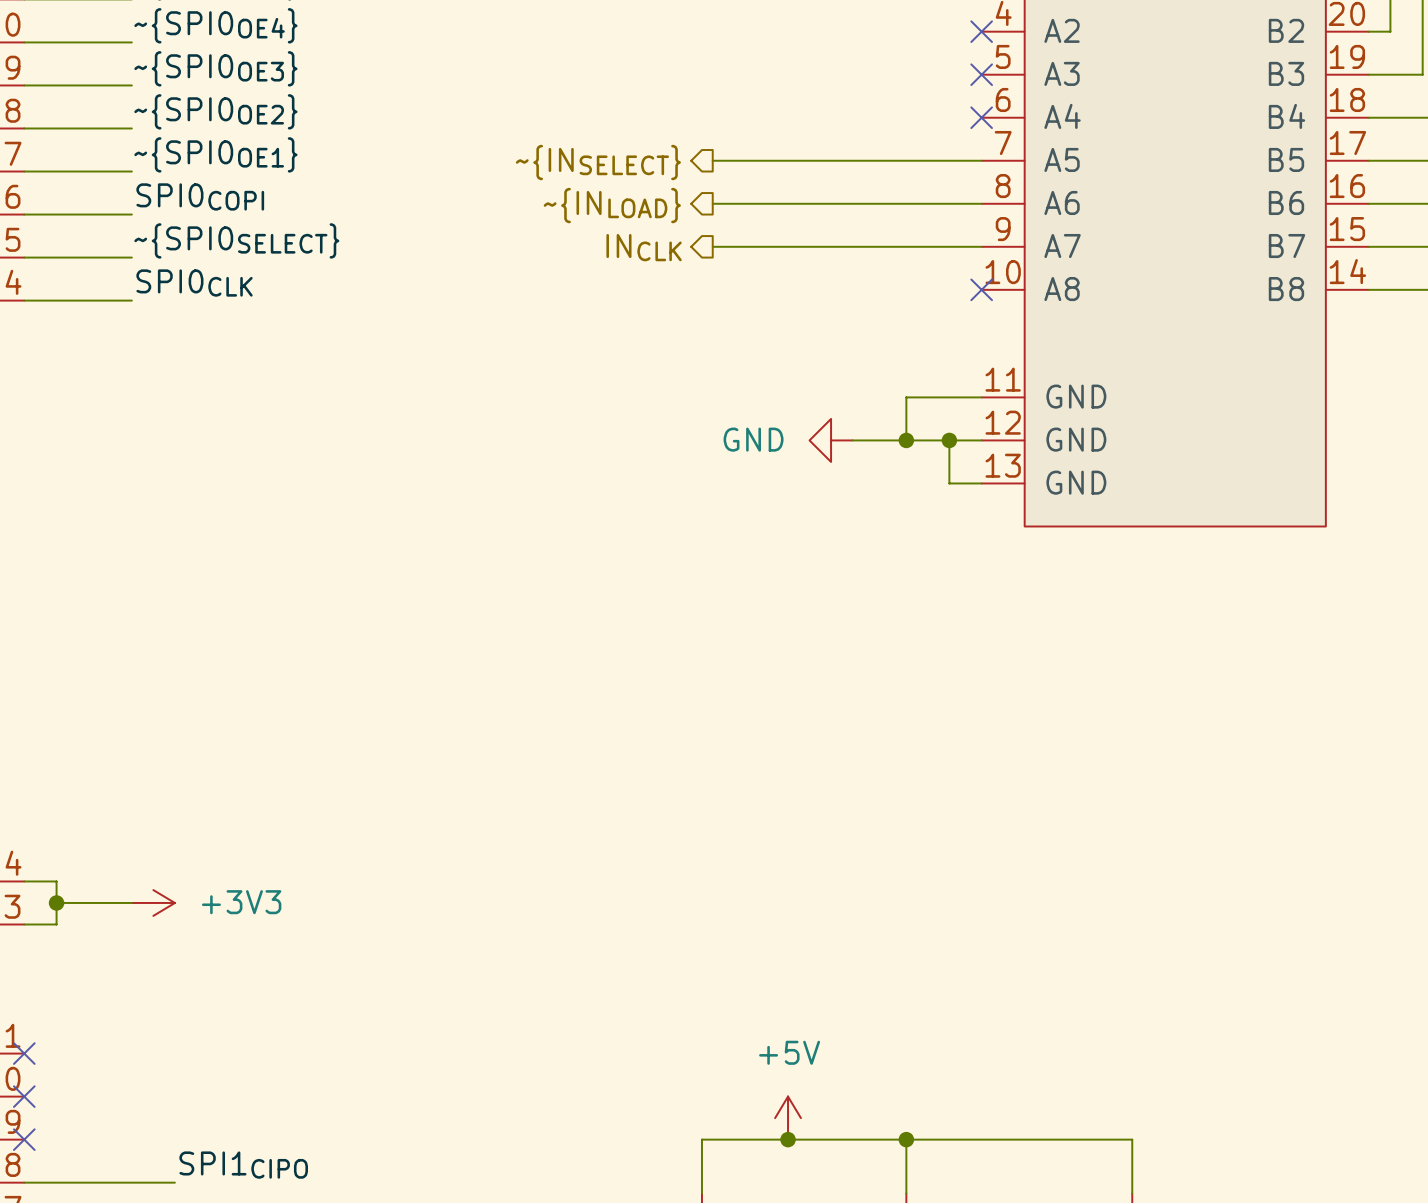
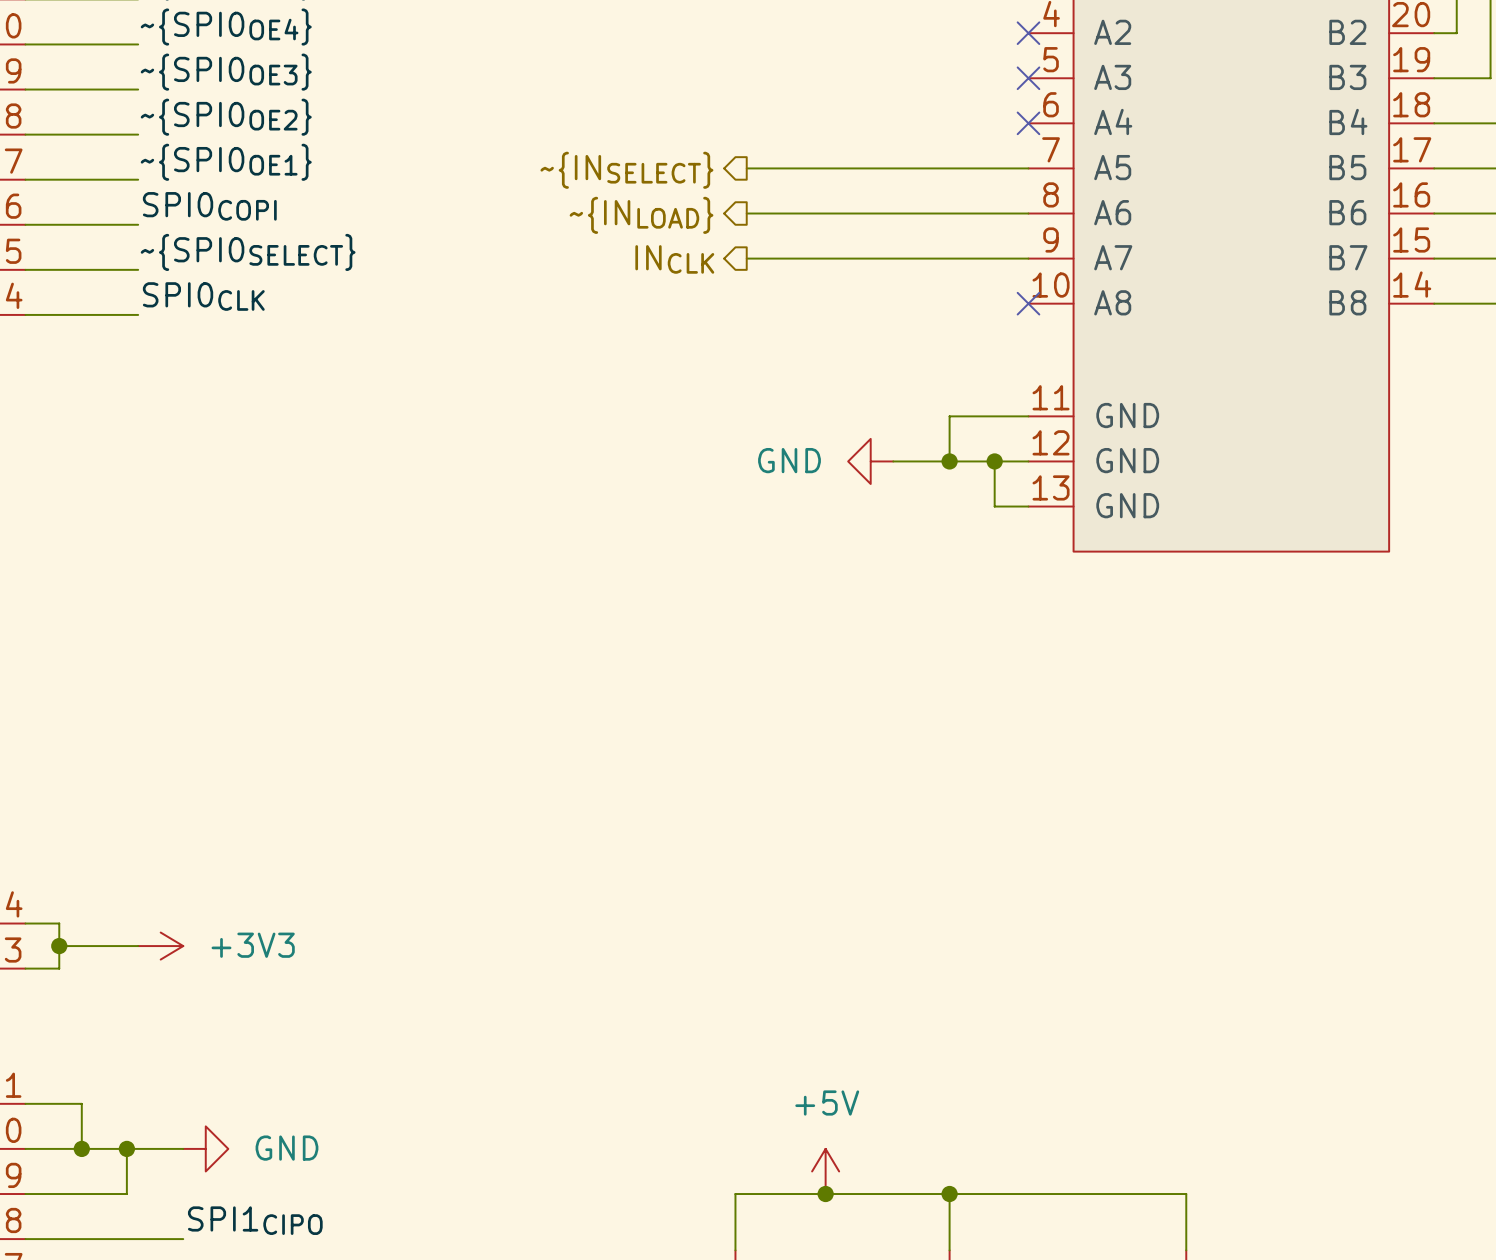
wire: none -> (25, 1103) (81, 1103) (81, 1148)
no-connect mark: (24, 1053) -> none
wire: none -> (25, 1148) (183, 1148)
no-connect mark: (24, 1096) -> none
junction: none -> (81, 1148)
wire: none -> (126, 1148) (126, 1194) (25, 1194)
junction: none -> (126, 1148)
power symbol: none -> GND (205, 1148)
no-connect mark: (24, 1139) -> none

